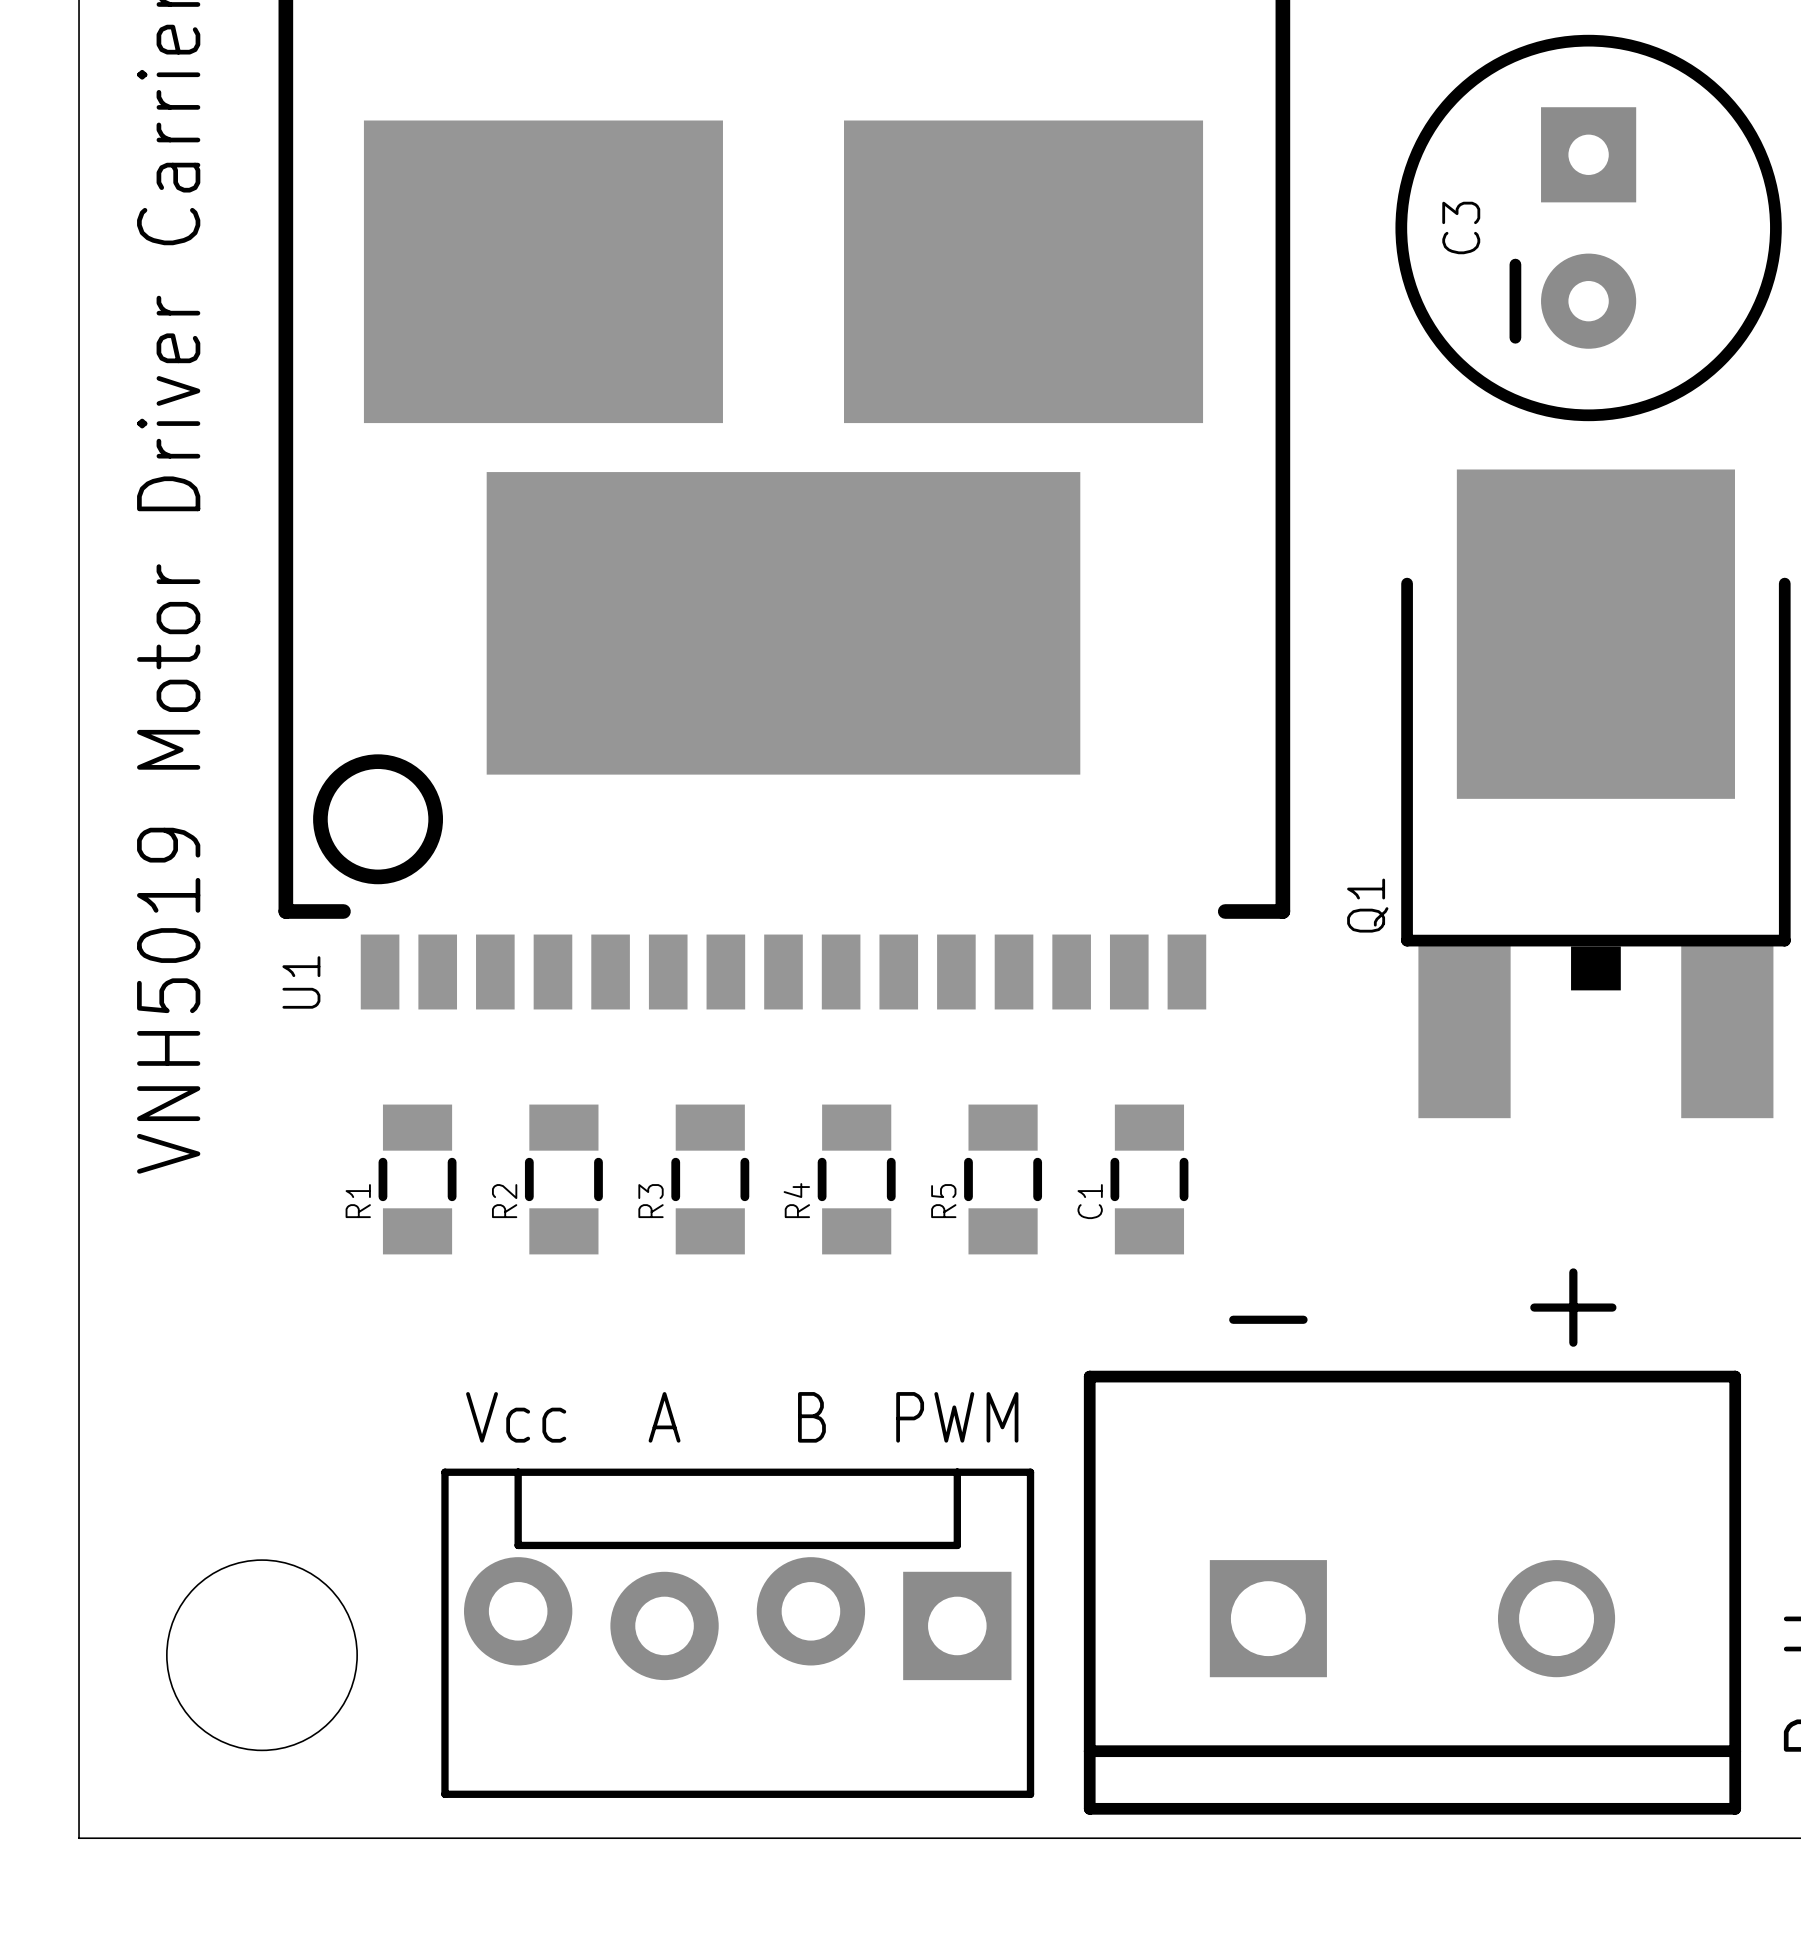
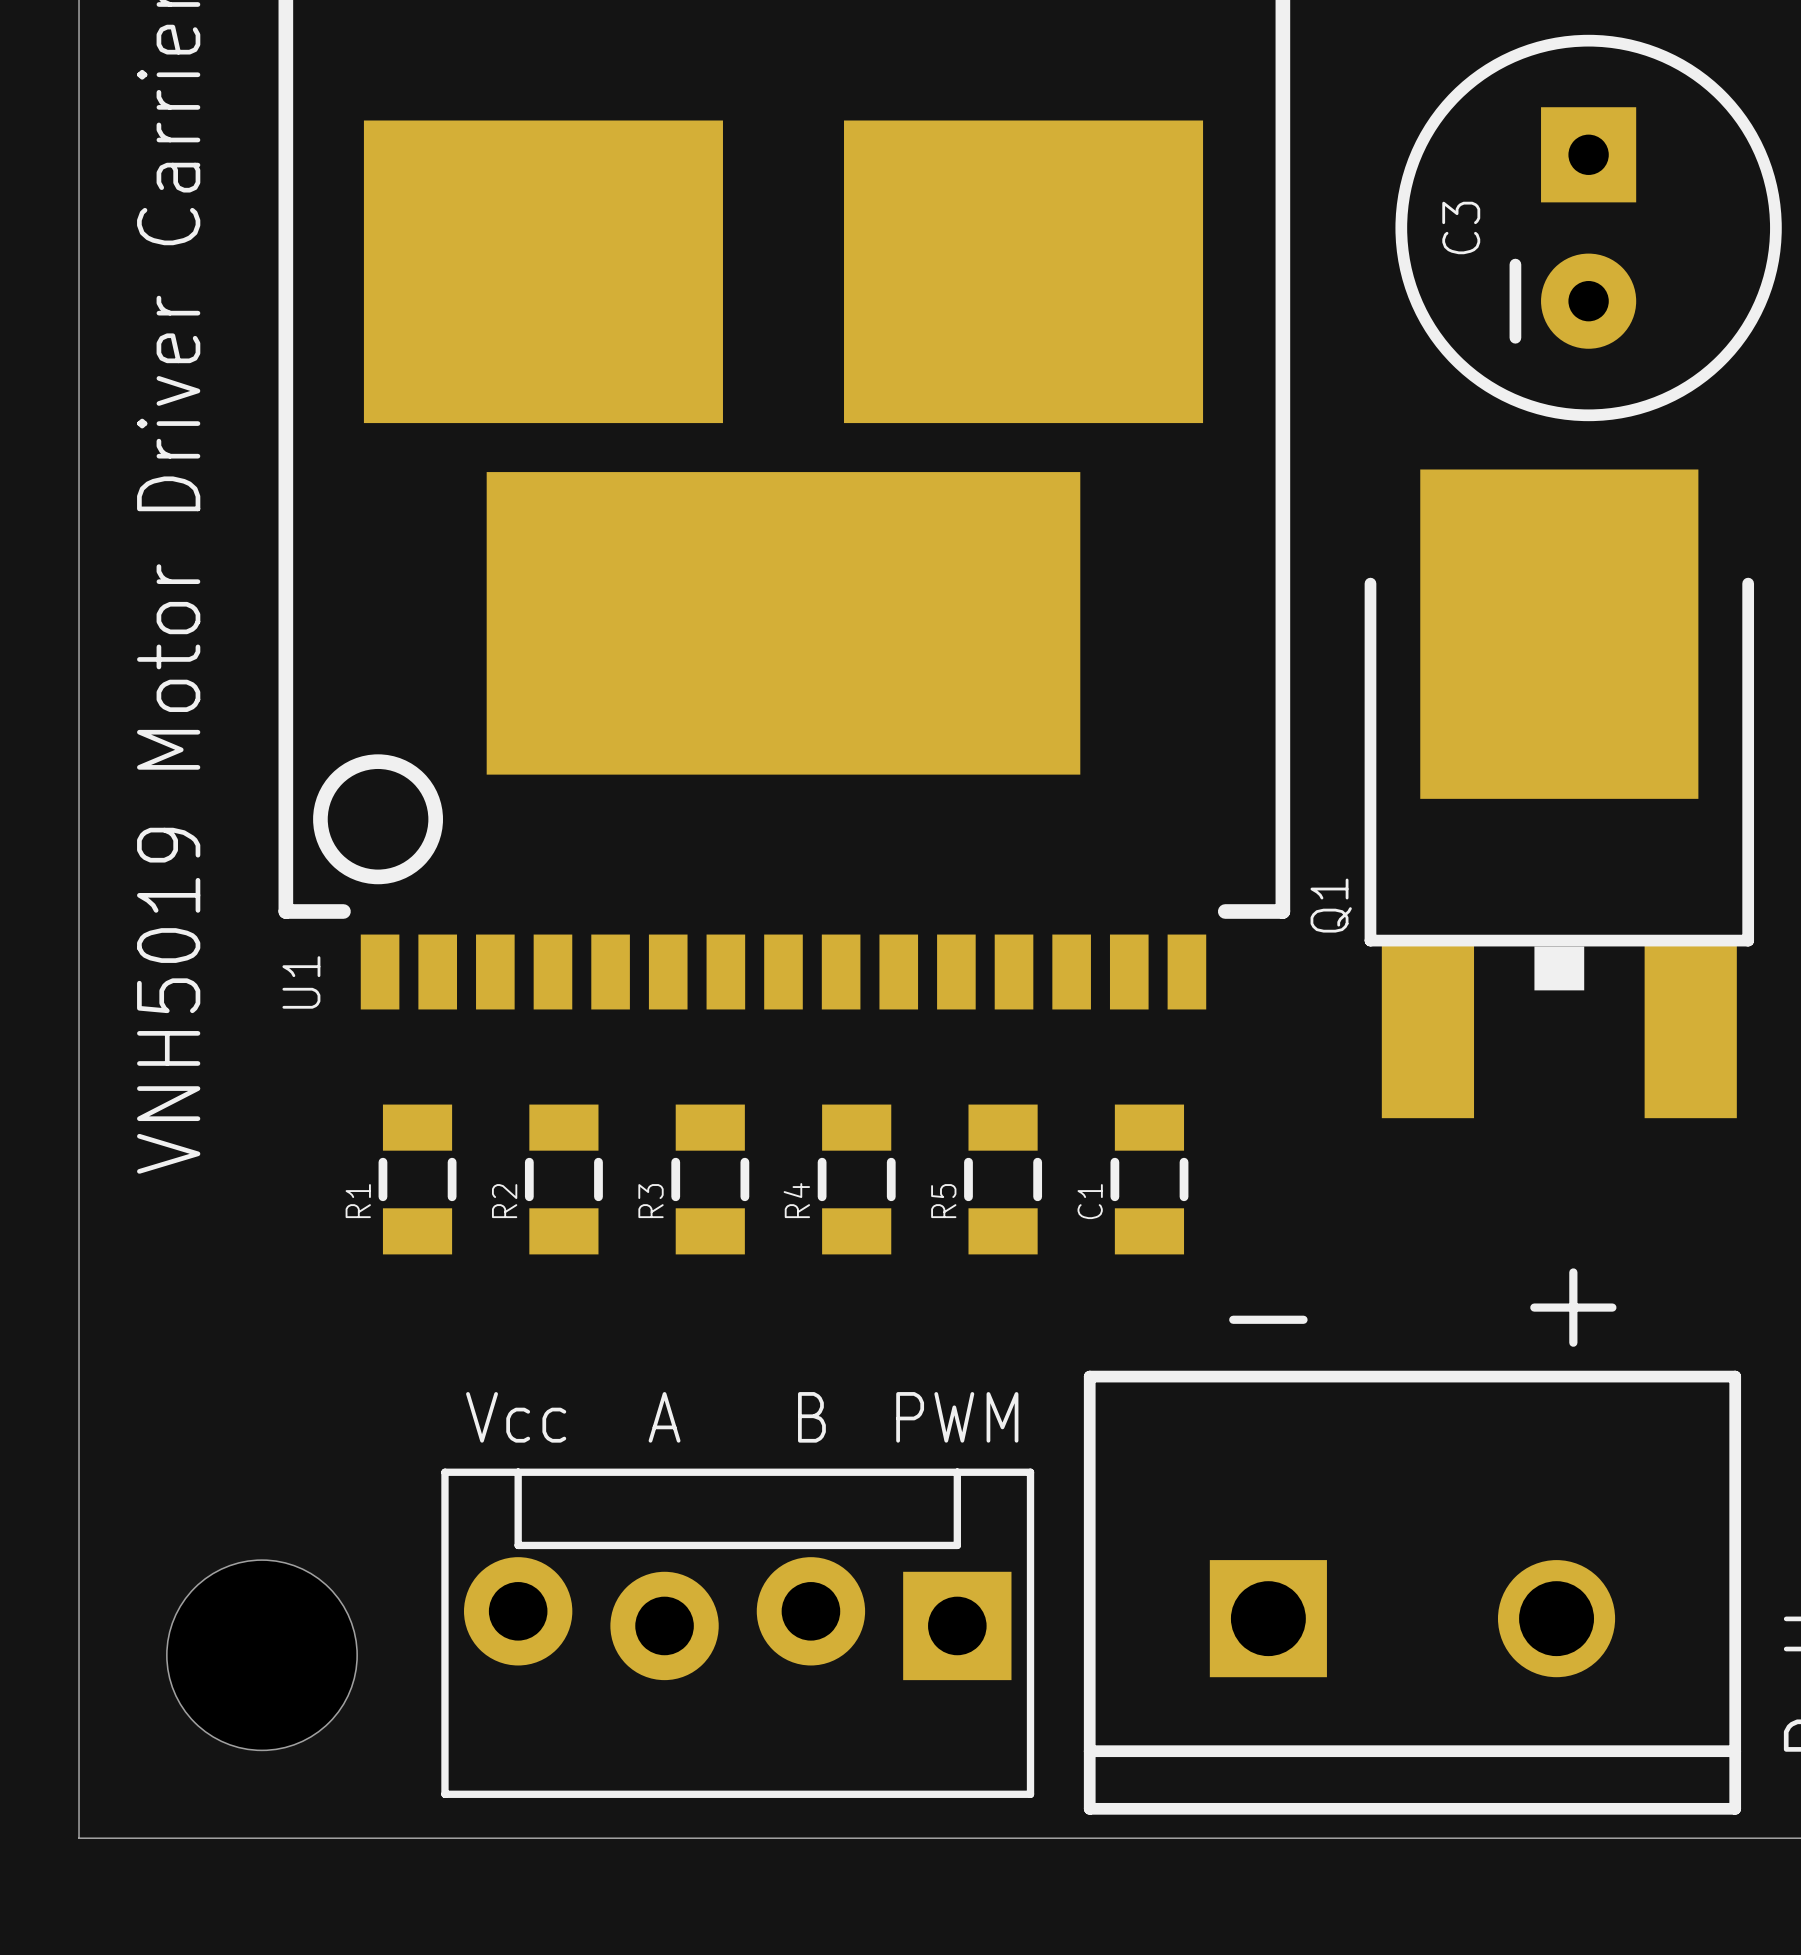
Q1 position: (1595, 793) -> (1559, 793)

